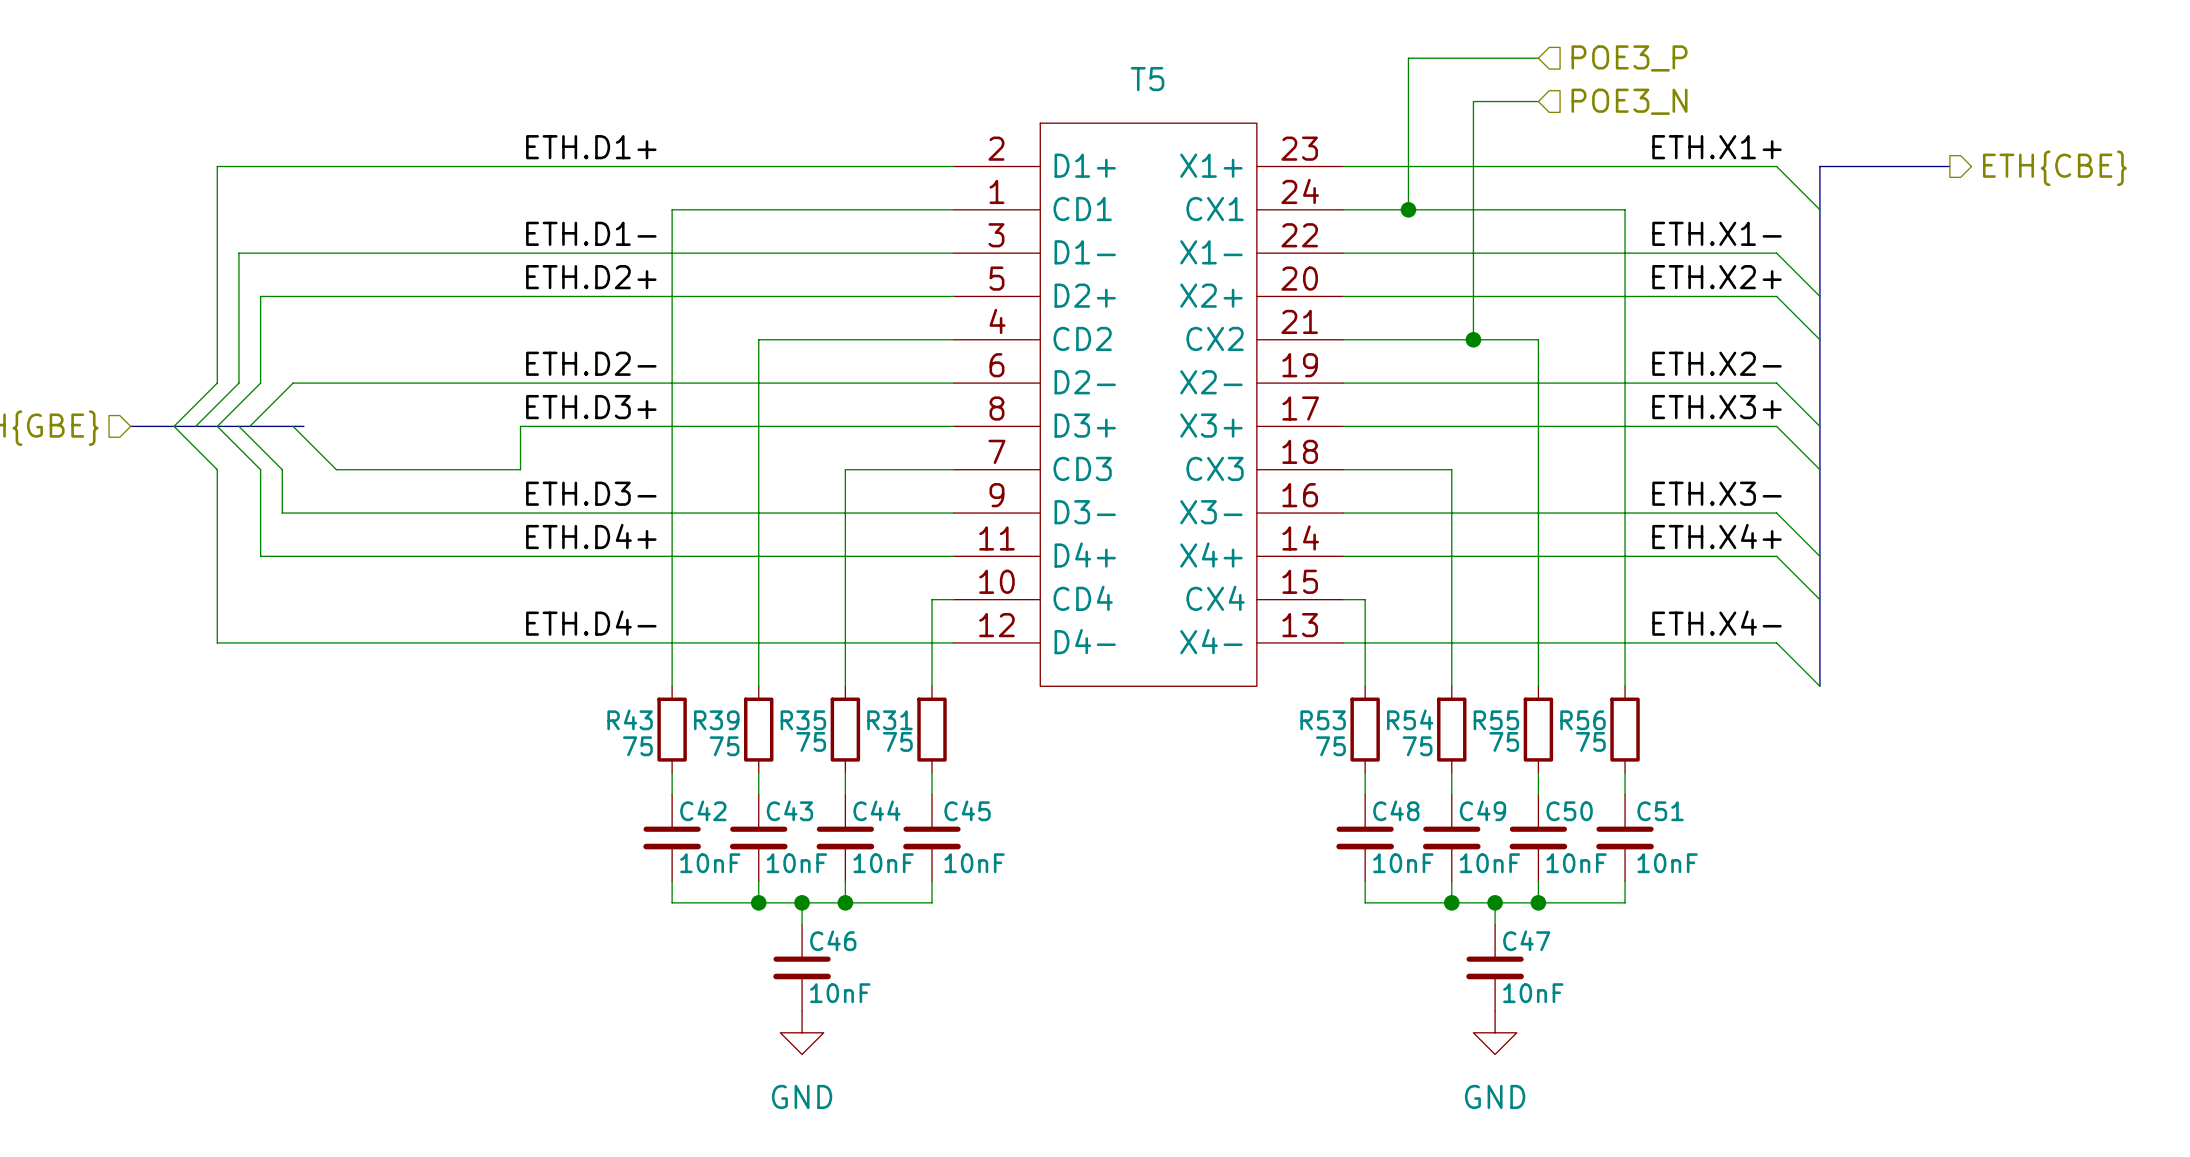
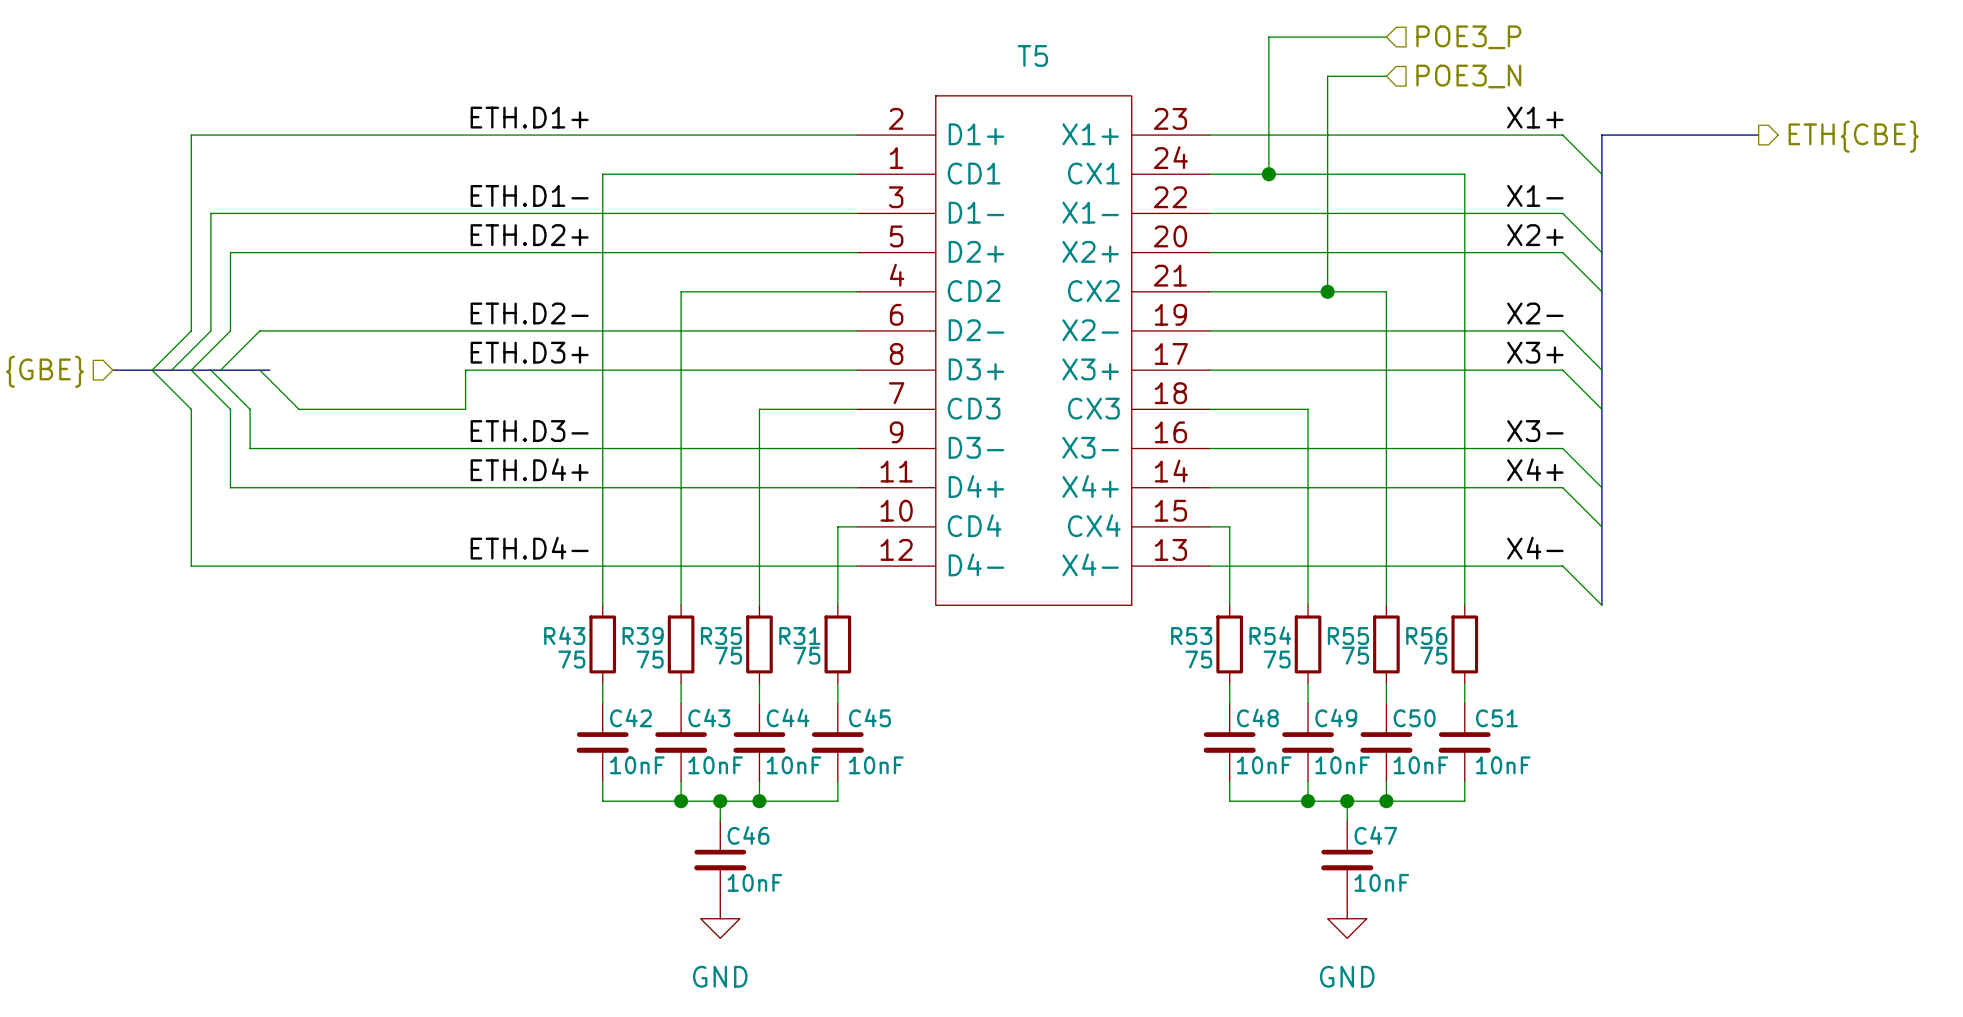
label: none -> X1+ (1535, 117)
label: ETH.X1+ (1716, 147) -> none
wire: (1733, 166) (1776, 166) (1819, 209) -> (1562, 135) (1601, 174)
bus: (1819, 166) (1819, 686) -> (1641, 135) (1601, 135) (1601, 605)
label: none -> X1- (1535, 195)
label: ETH.X1- (1716, 233) -> none
wire: (1733, 253) (1776, 253) (1819, 296) -> (1562, 213) (1601, 252)
label: none -> X2+ (1535, 235)
label: ETH.X2+ (1716, 277) -> none
wire: (1733, 296) (1776, 296) (1819, 339) -> (1562, 252) (1601, 291)
label: none -> X2- (1535, 313)
label: ETH.X2- (1716, 363) -> none
wire: (1733, 383) (1776, 383) (1819, 426) -> (1562, 330) (1601, 370)
label: none -> X3+ (1535, 352)
label: ETH.X3+ (1716, 407) -> none
wire: (1733, 426) (1776, 426) (1819, 469) -> (1562, 370) (1601, 409)
label: none -> X3- (1535, 431)
label: ETH.X3- (1716, 493) -> none
wire: (1733, 513) (1776, 513) (1819, 556) -> (1562, 448) (1601, 487)
label: none -> X4+ (1535, 469)
label: ETH.X4+ (1716, 536) -> none
wire: (1733, 556) (1776, 556) (1819, 599) -> (1562, 487) (1601, 526)
label: none -> X4- (1535, 548)
label: ETH.X4- (1716, 623) -> none
wire: (1733, 642) (1776, 642) (1819, 686) -> (1562, 566) (1601, 605)

